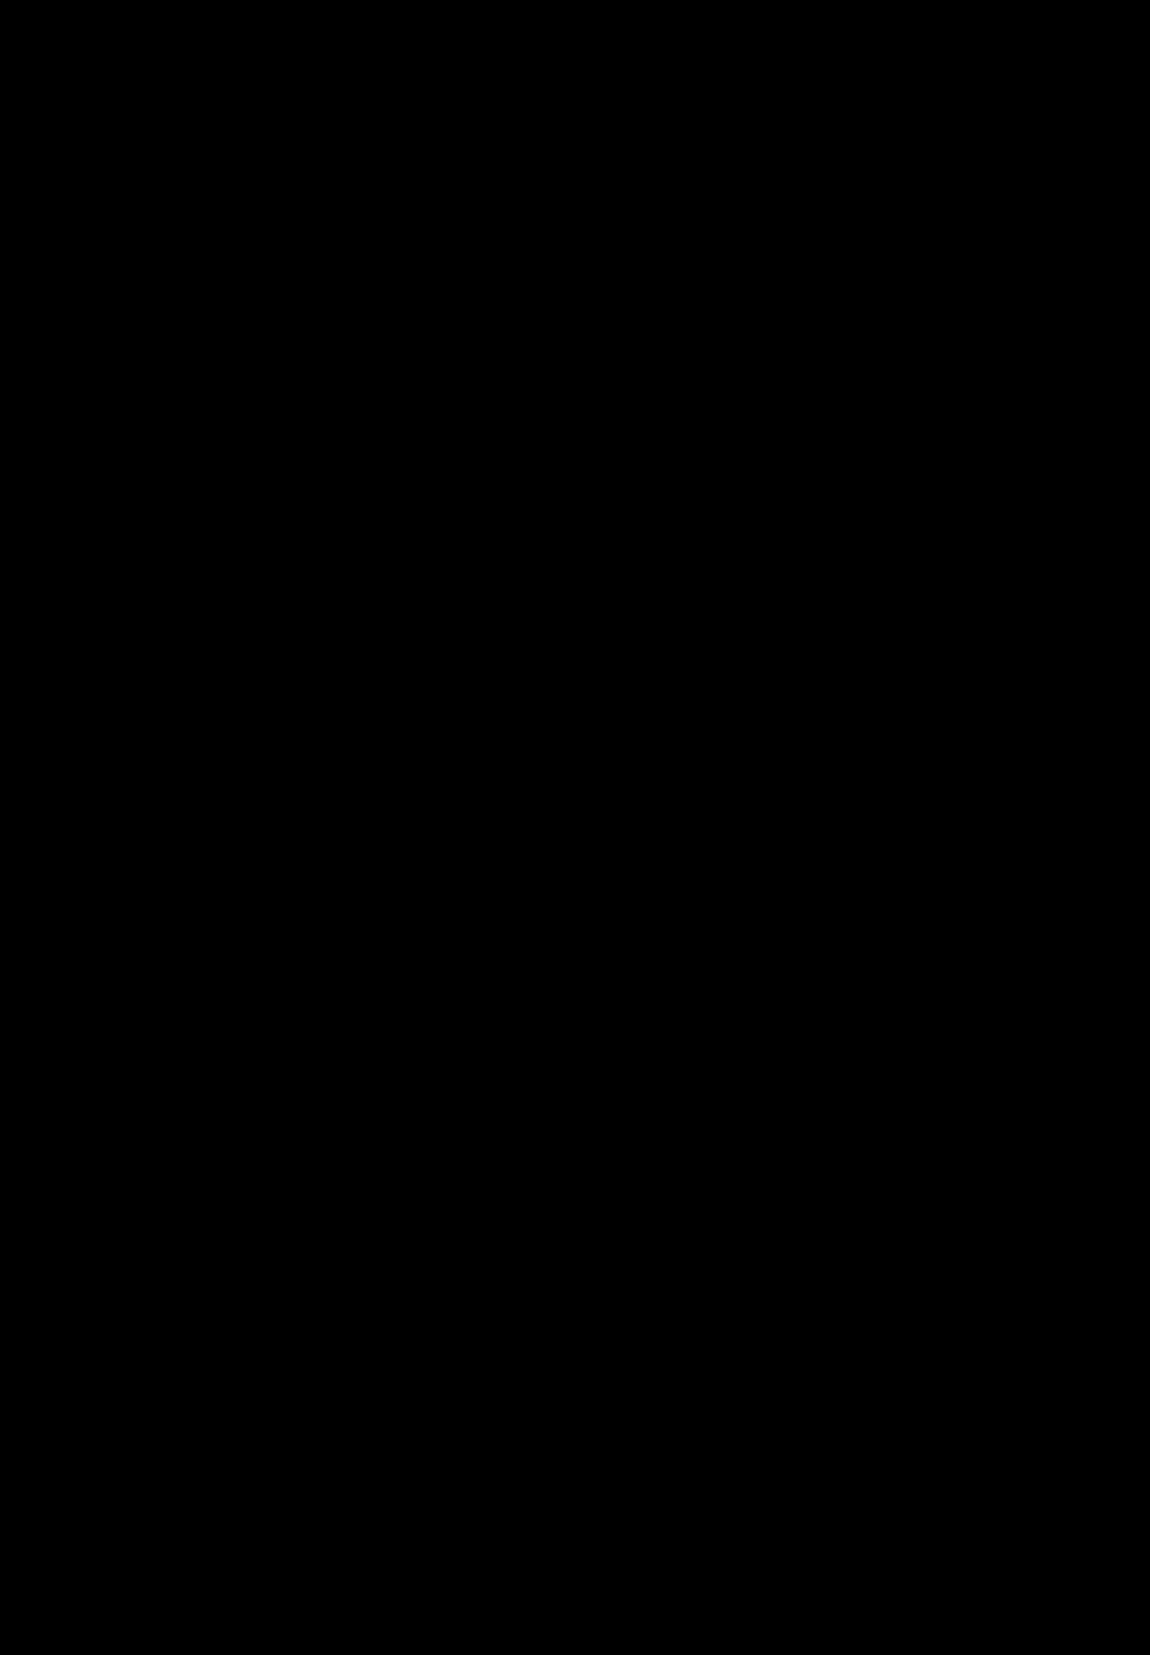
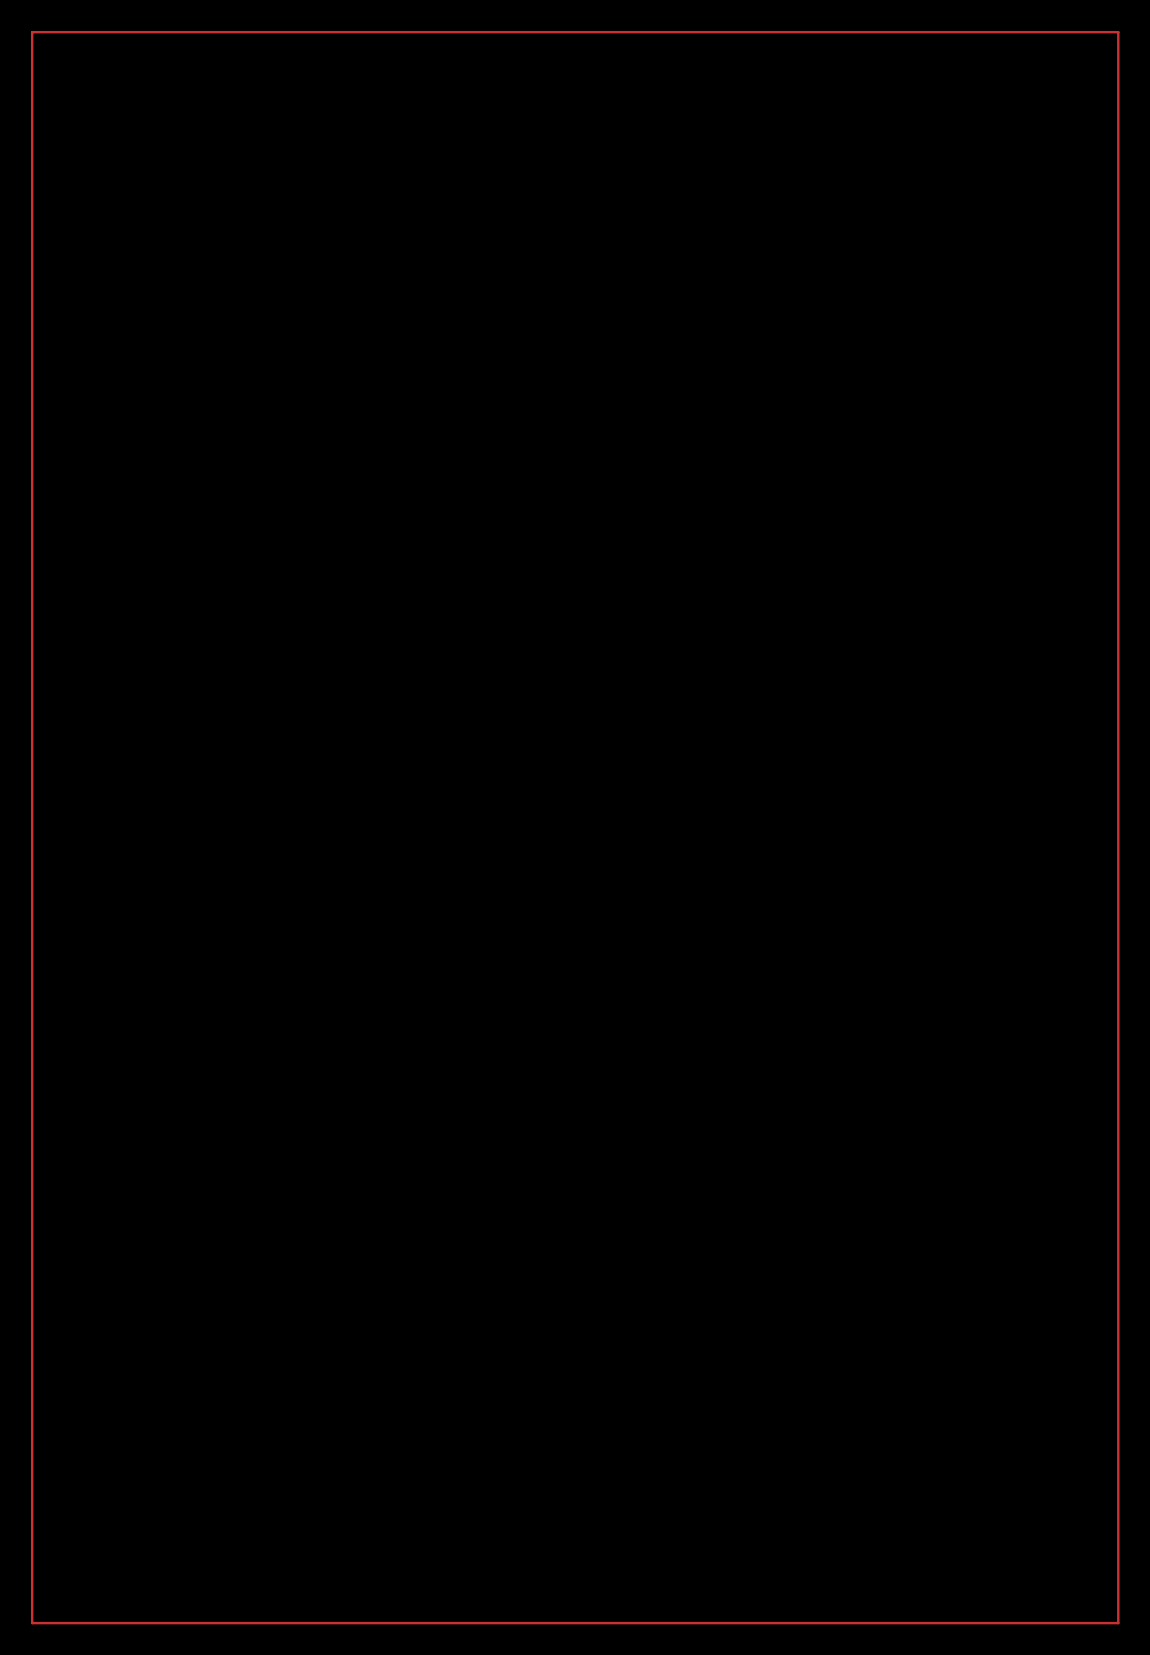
part: none -> (575, 827)

